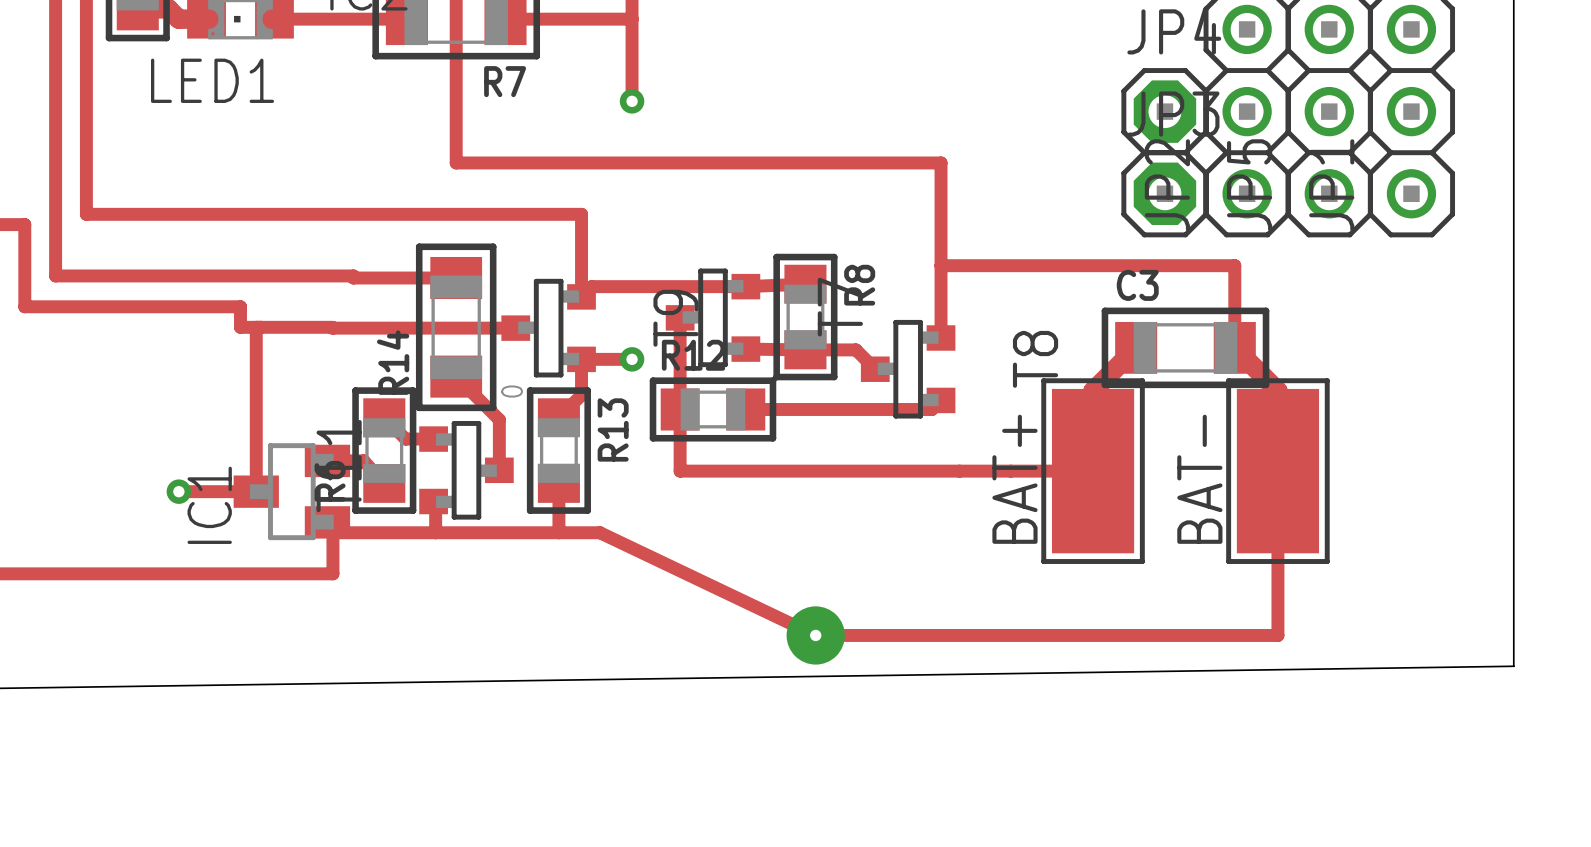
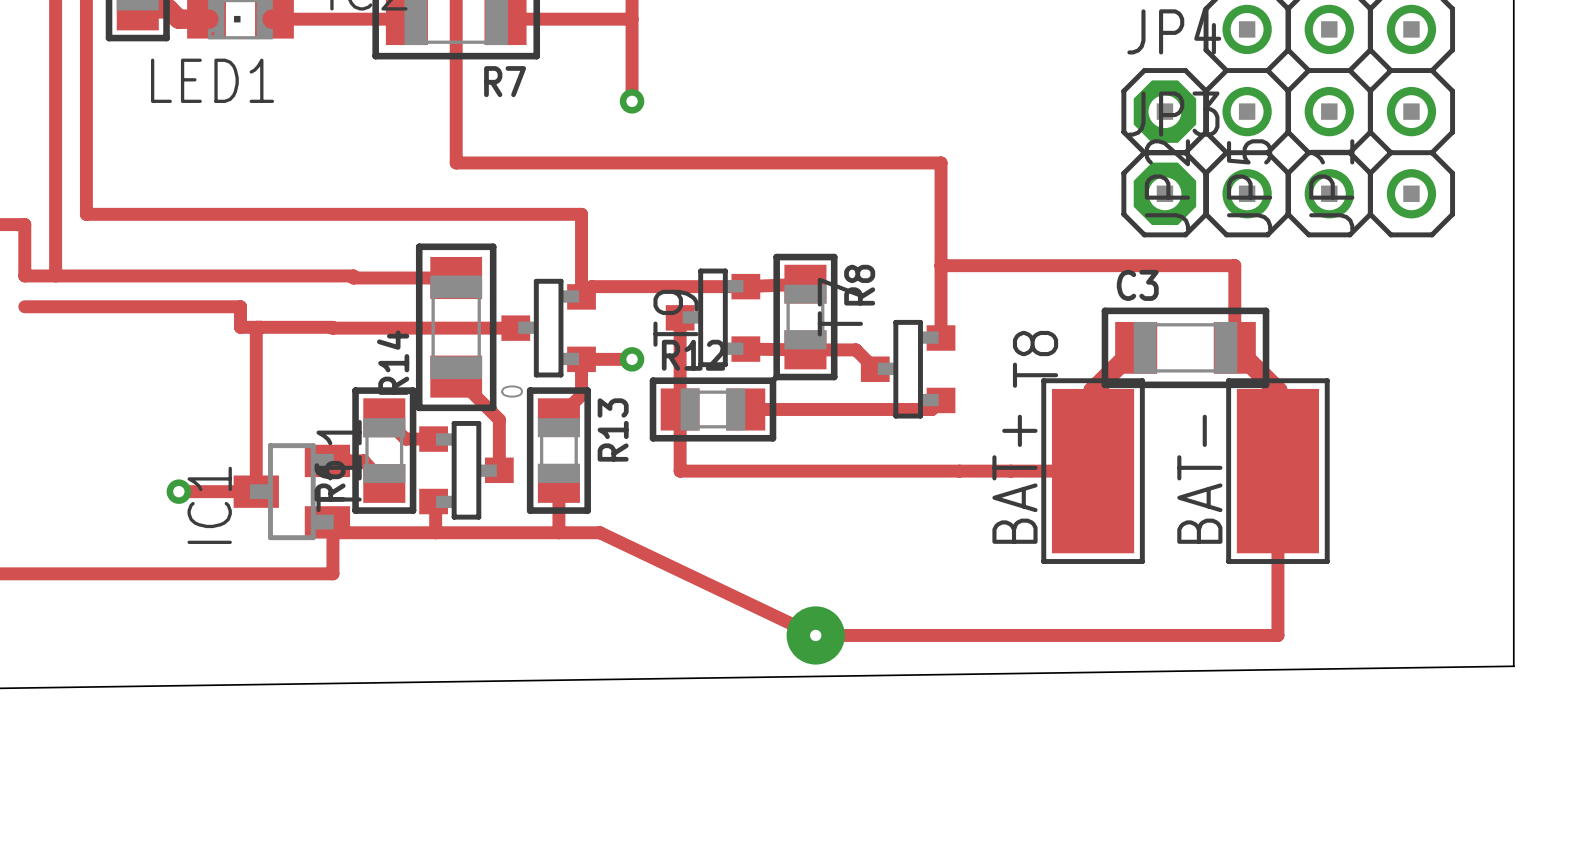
track: (24, 275) (24, 306) -> (24, 275) (55, 275)

